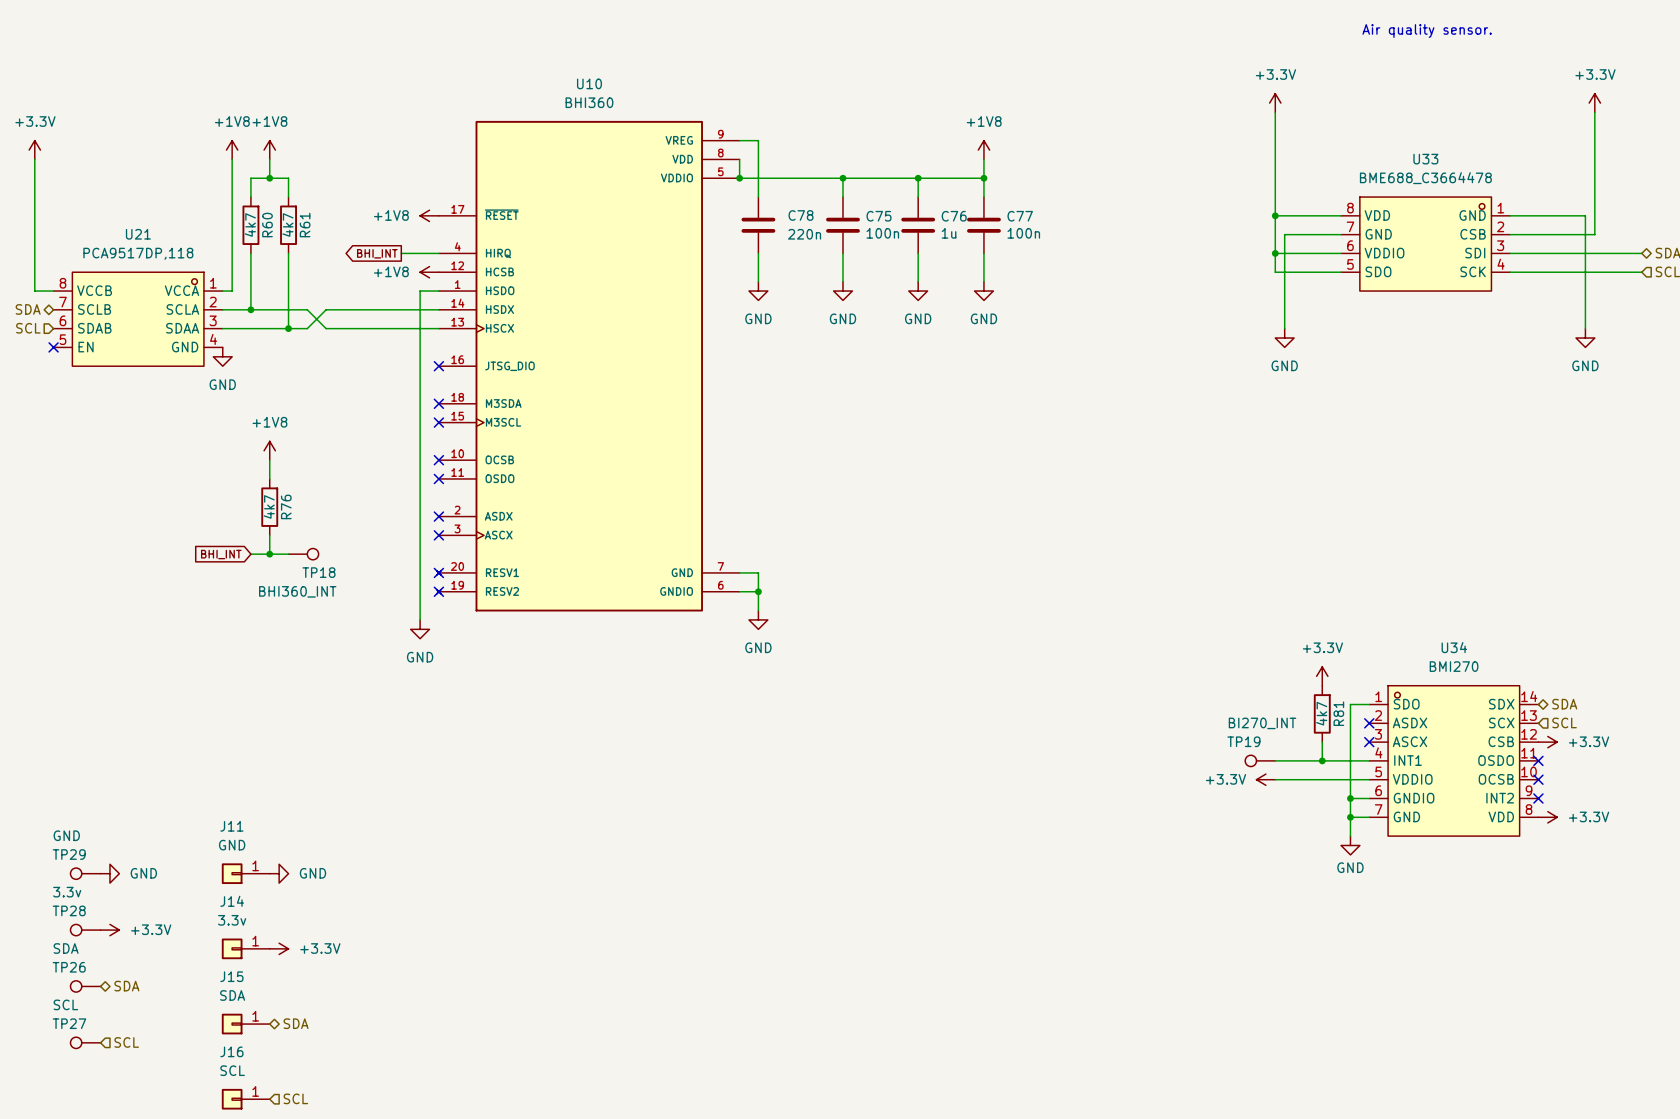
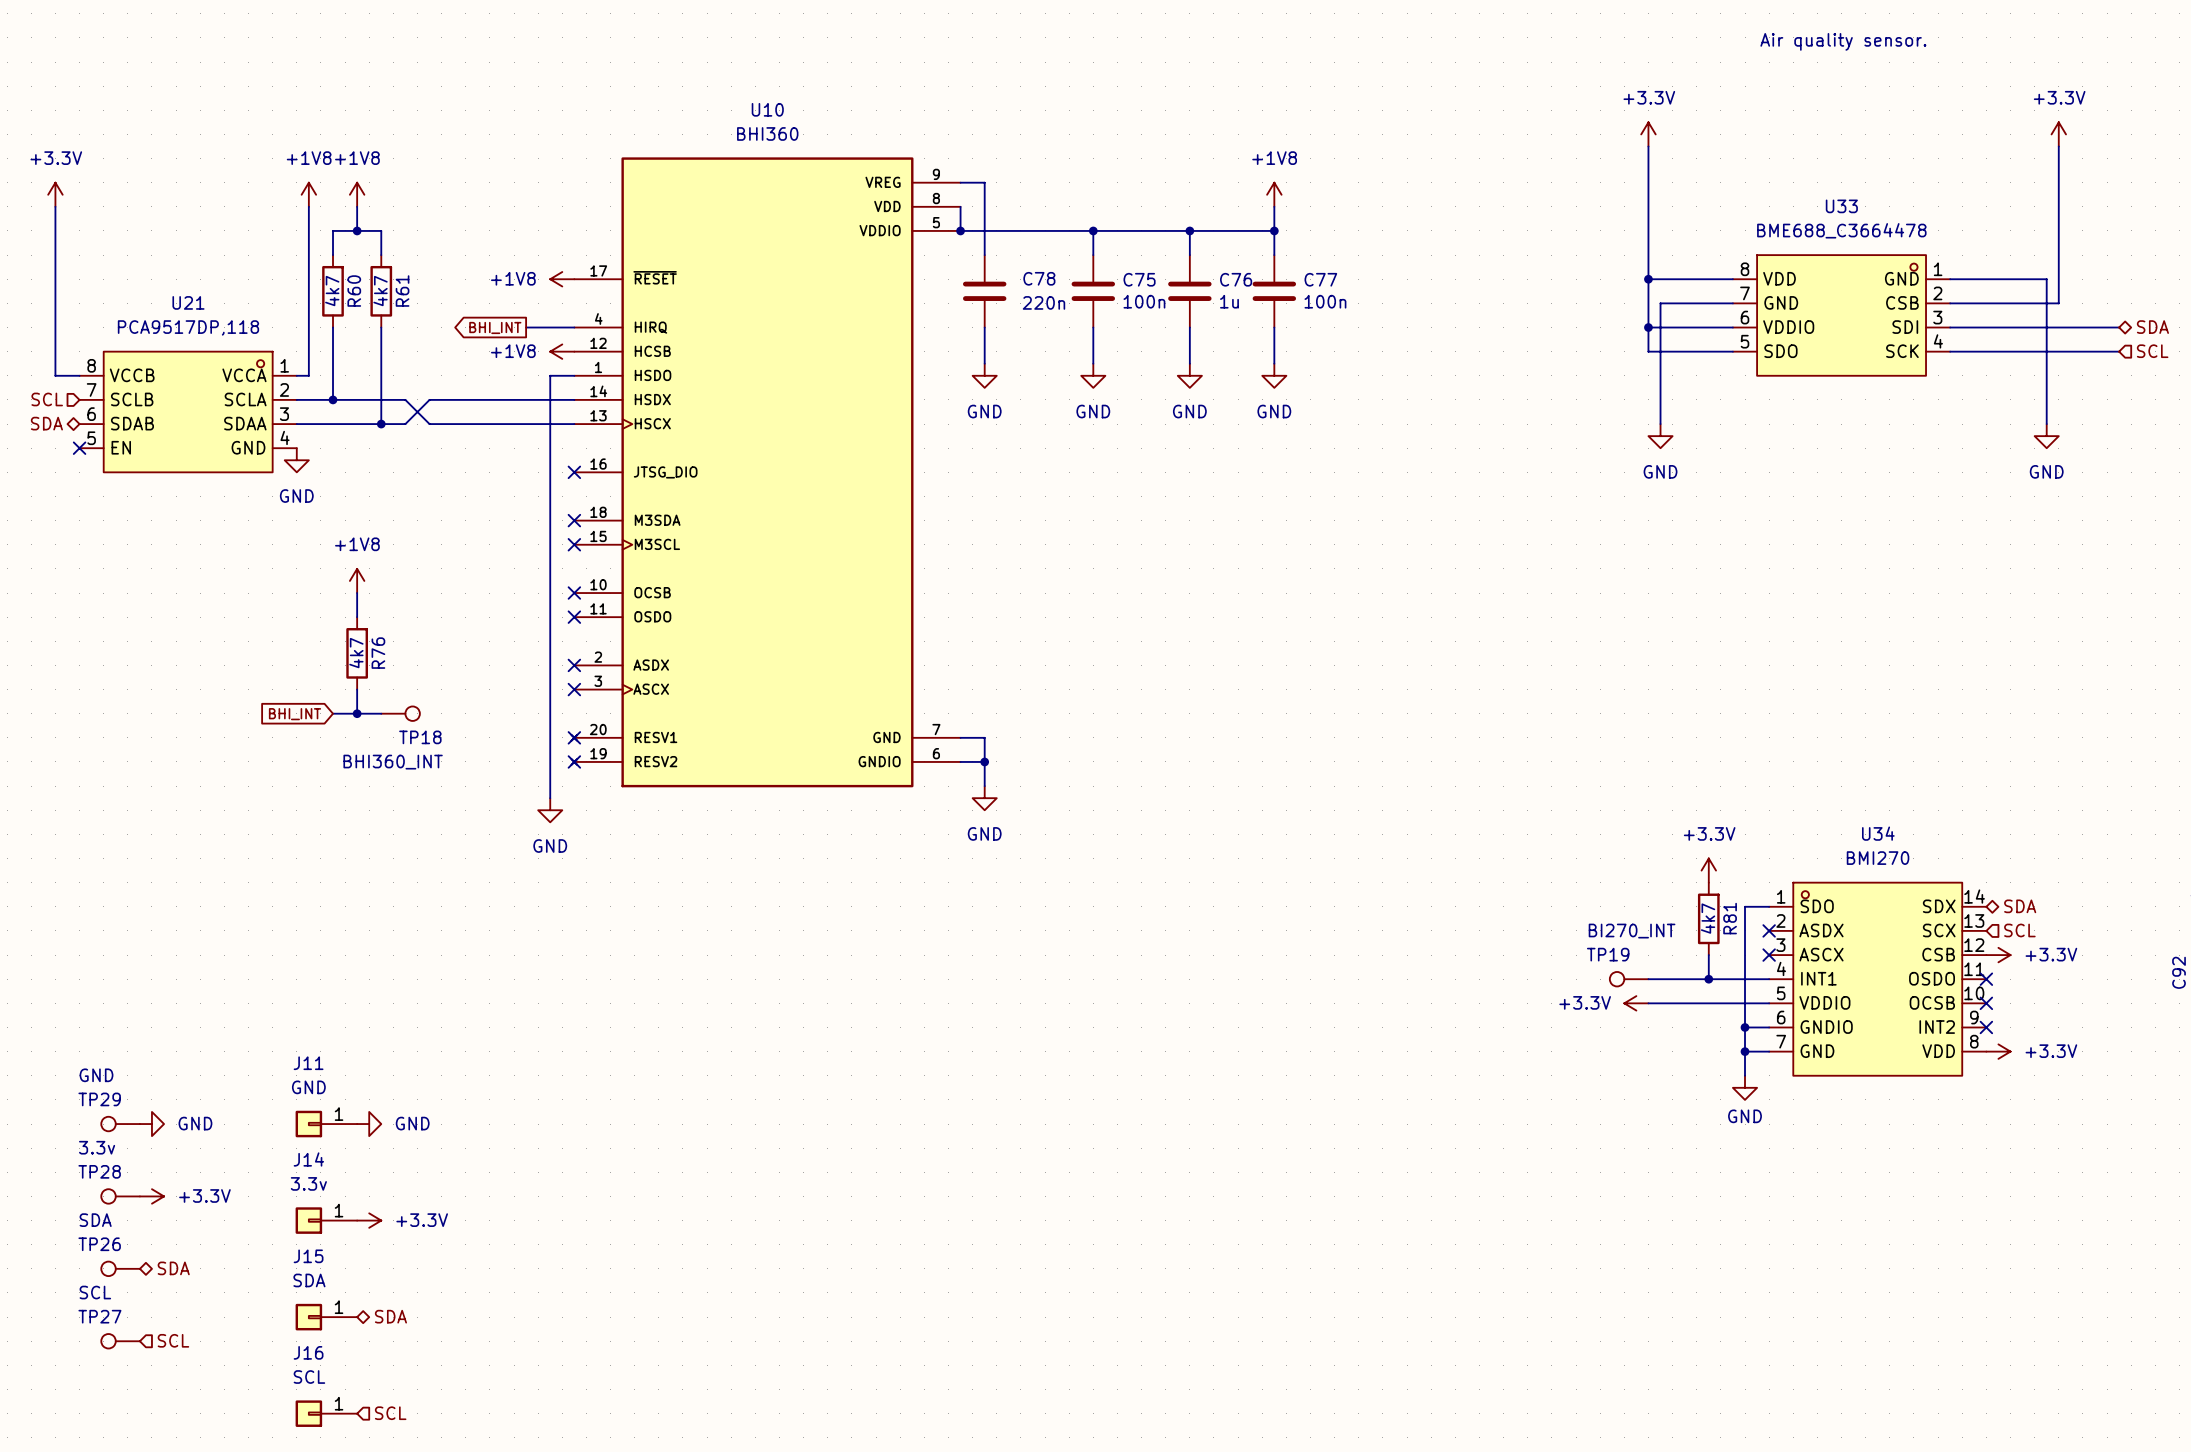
hierarchical label shape: bidirectional (28, 309) -> input (47, 399)
hierarchical label: SDA (28, 309) -> SCL (47, 399)
hierarchical label shape: input (28, 328) -> bidirectional (46, 423)
hierarchical label: SCL (28, 328) -> SDA (46, 423)

